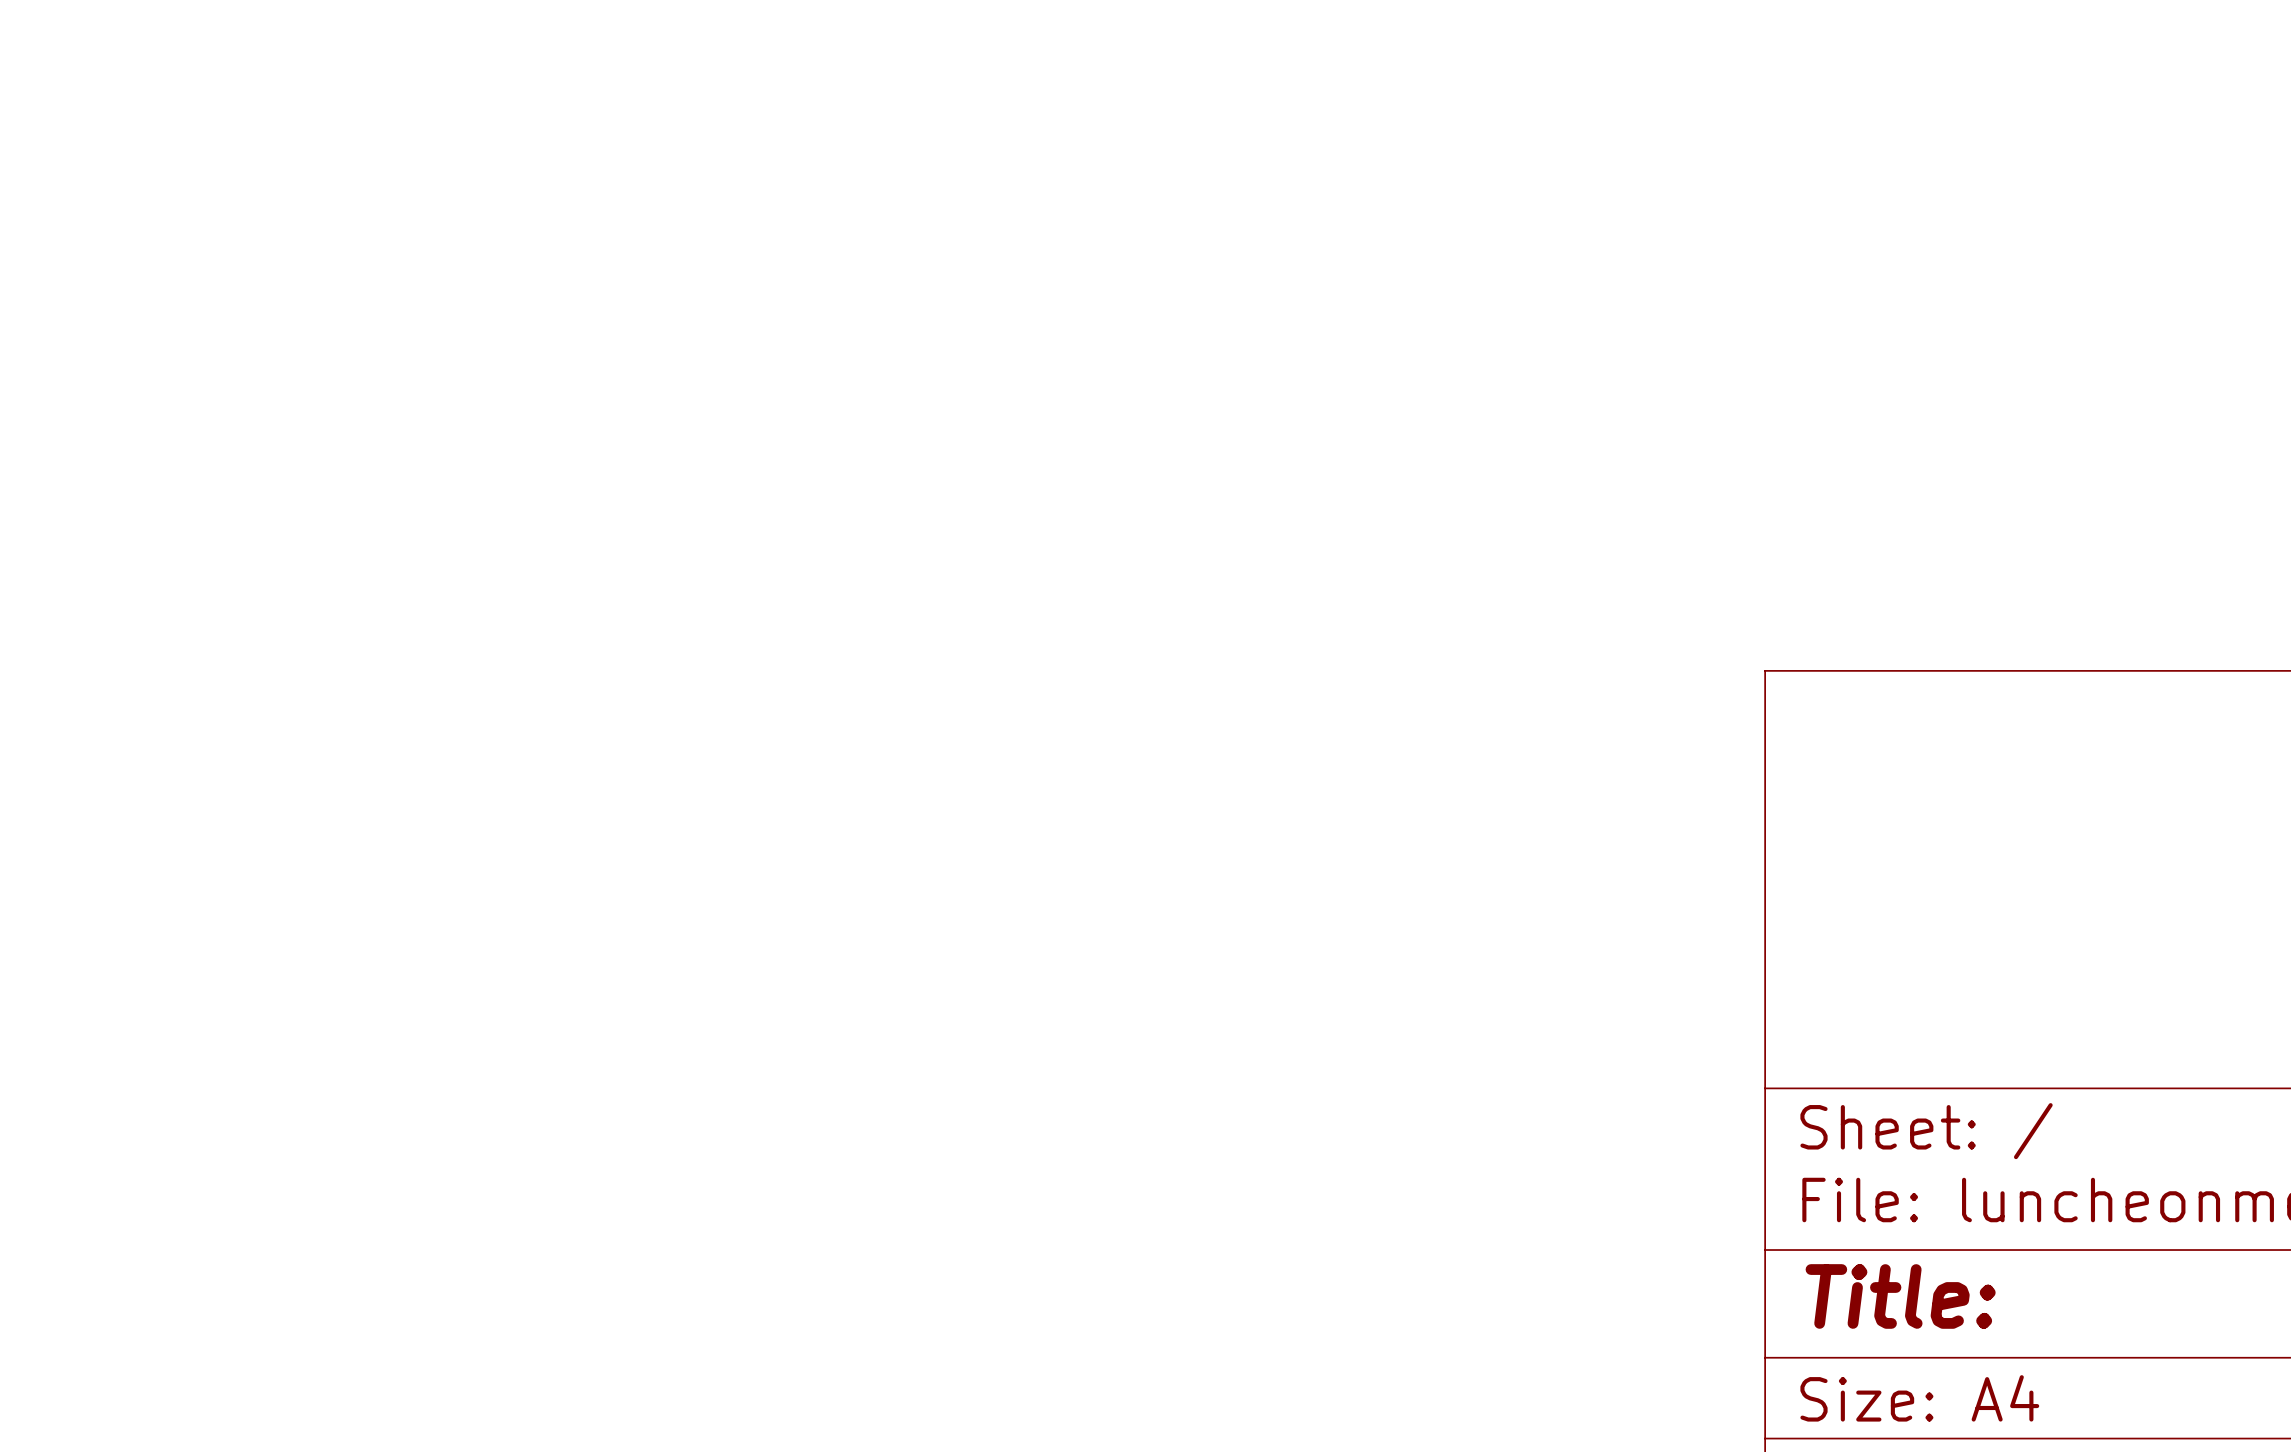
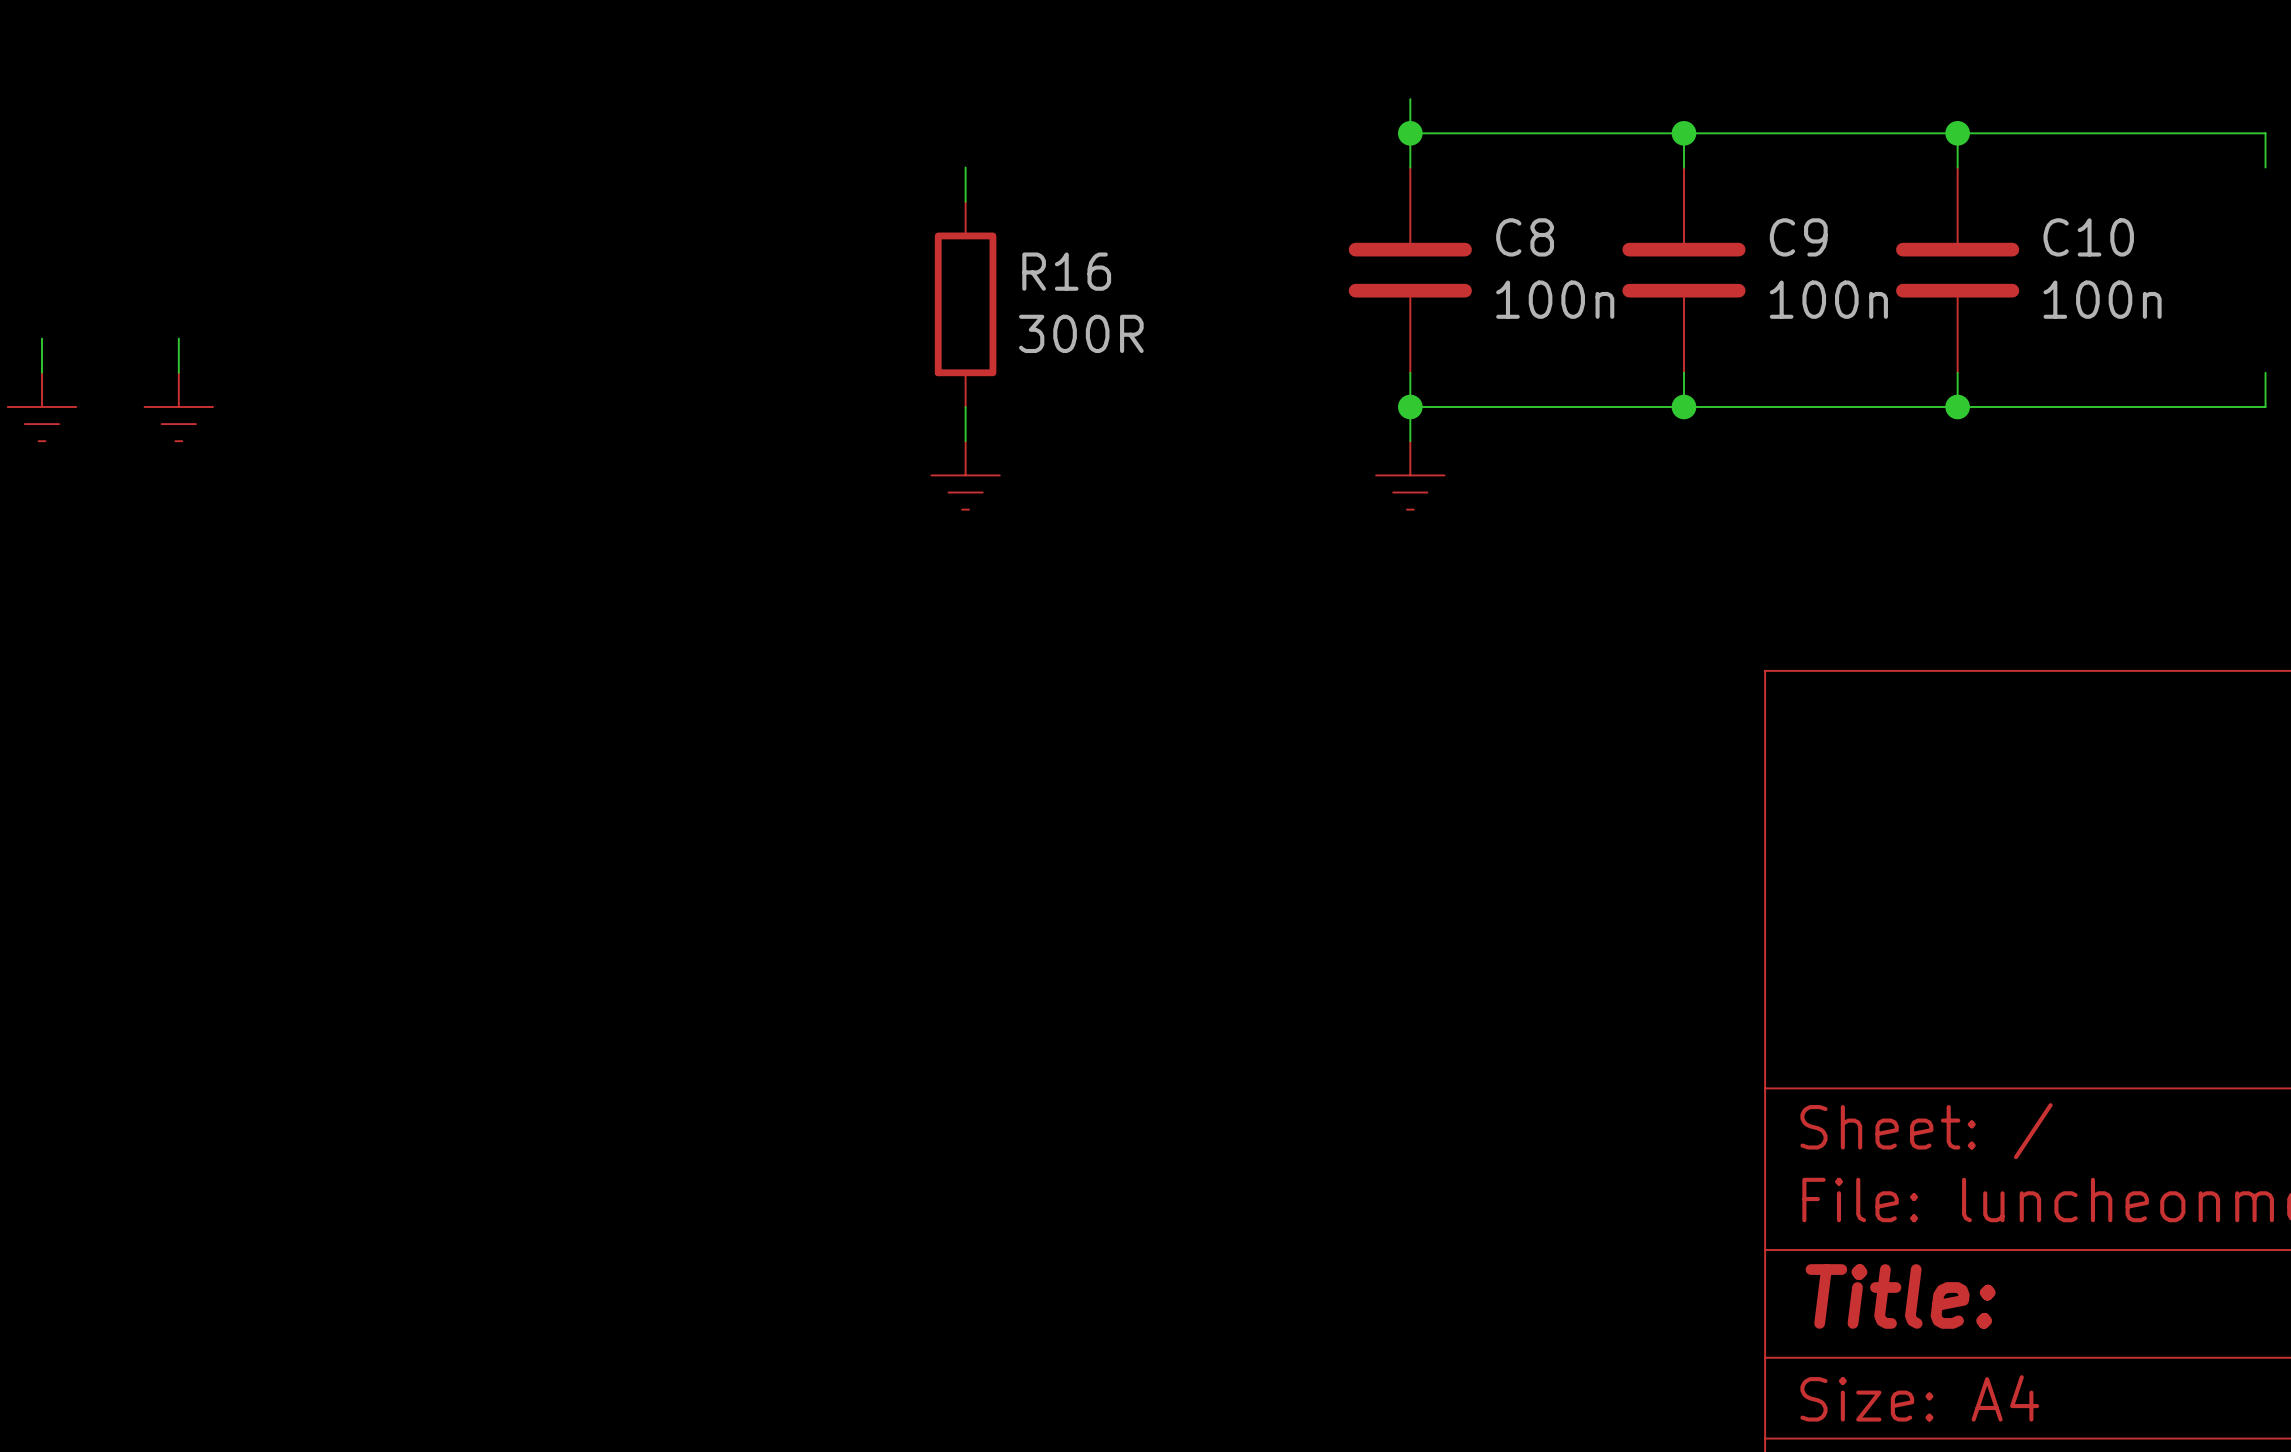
wire: none -> (1410, 99) (1410, 167)
wire: none -> (1410, 133) (2265, 133) (2265, 167)
junction: none -> (1410, 133)
wire: none -> (1683, 133) (1683, 167)
junction: none -> (1683, 133)
wire: none -> (1957, 133) (1957, 167)
junction: none -> (1957, 133)
wire: none -> (965, 167) (965, 201)
C8: none -> 100n (1410, 270)
C9: none -> 100n (1683, 270)
C10: none -> 100n (1957, 270)
R16: none -> 300R (965, 304)
wire: none -> (41, 338) (41, 372)
wire: none -> (178, 338) (178, 372)
wire: none -> (1410, 372) (1410, 441)
wire: none -> (1683, 372) (1683, 406)
wire: none -> (1957, 372) (1957, 406)
wire: none -> (2265, 372) (2265, 406) (1410, 406)
power symbol: none -> (41, 406)
power symbol: none -> (178, 406)
wire: none -> (965, 406) (965, 441)
junction: none -> (1410, 406)
junction: none -> (1683, 406)
junction: none -> (1957, 406)
power symbol: none -> (965, 475)
power symbol: none -> (1410, 475)

